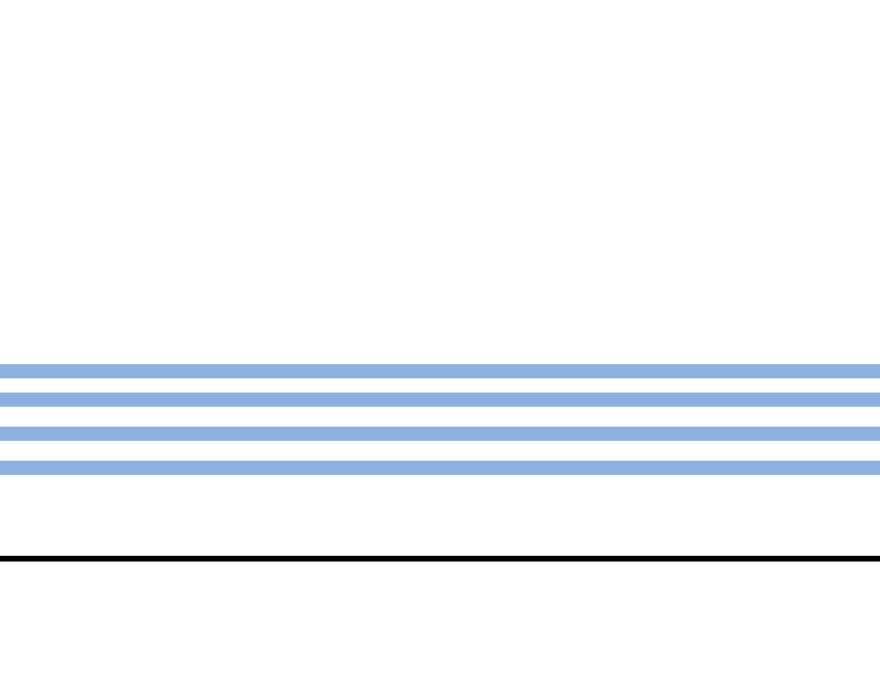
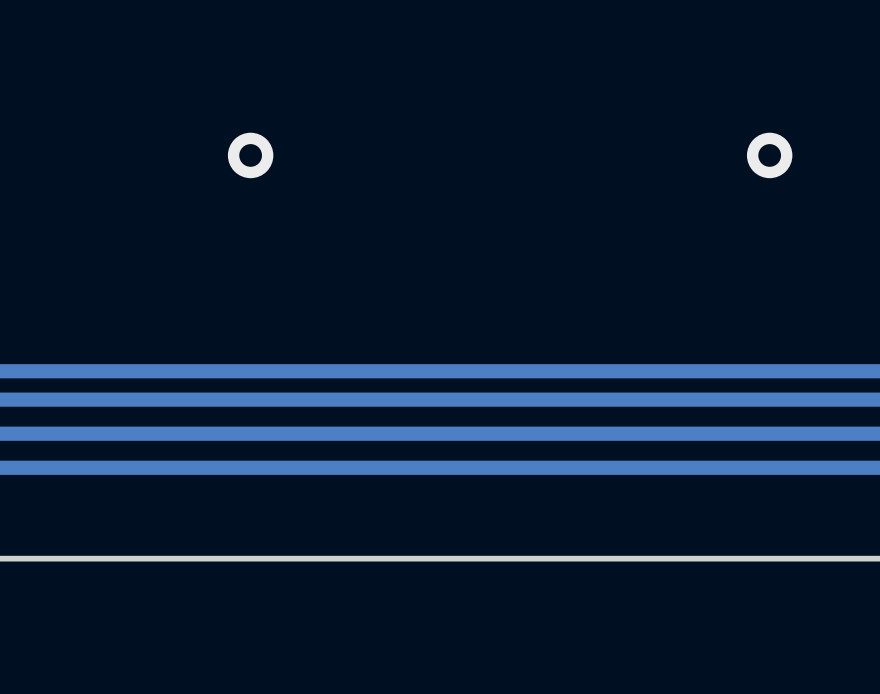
via: none -> (250, 155)
via: none -> (769, 155)

